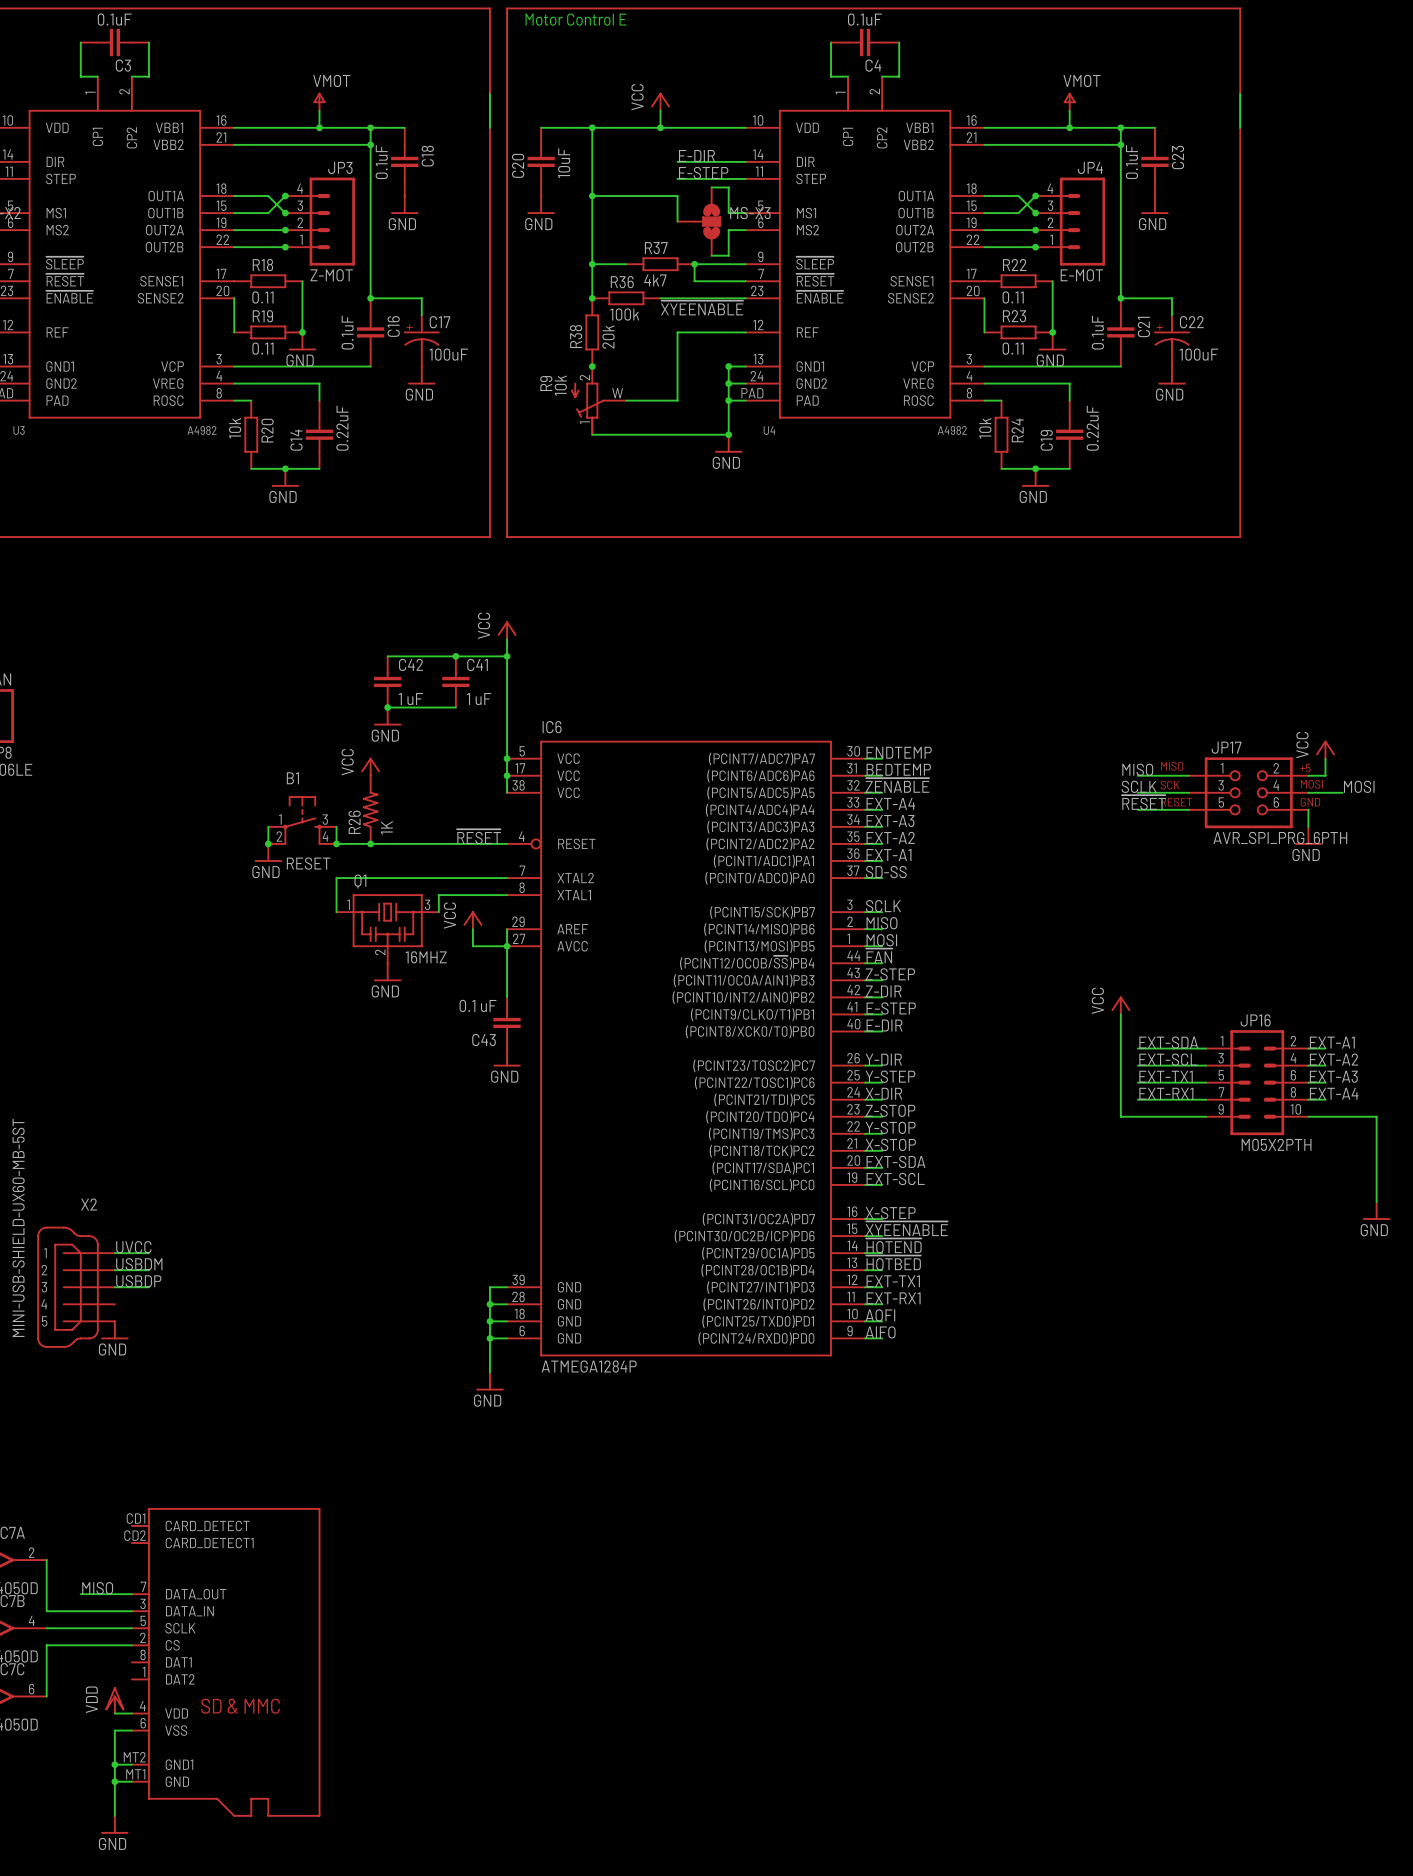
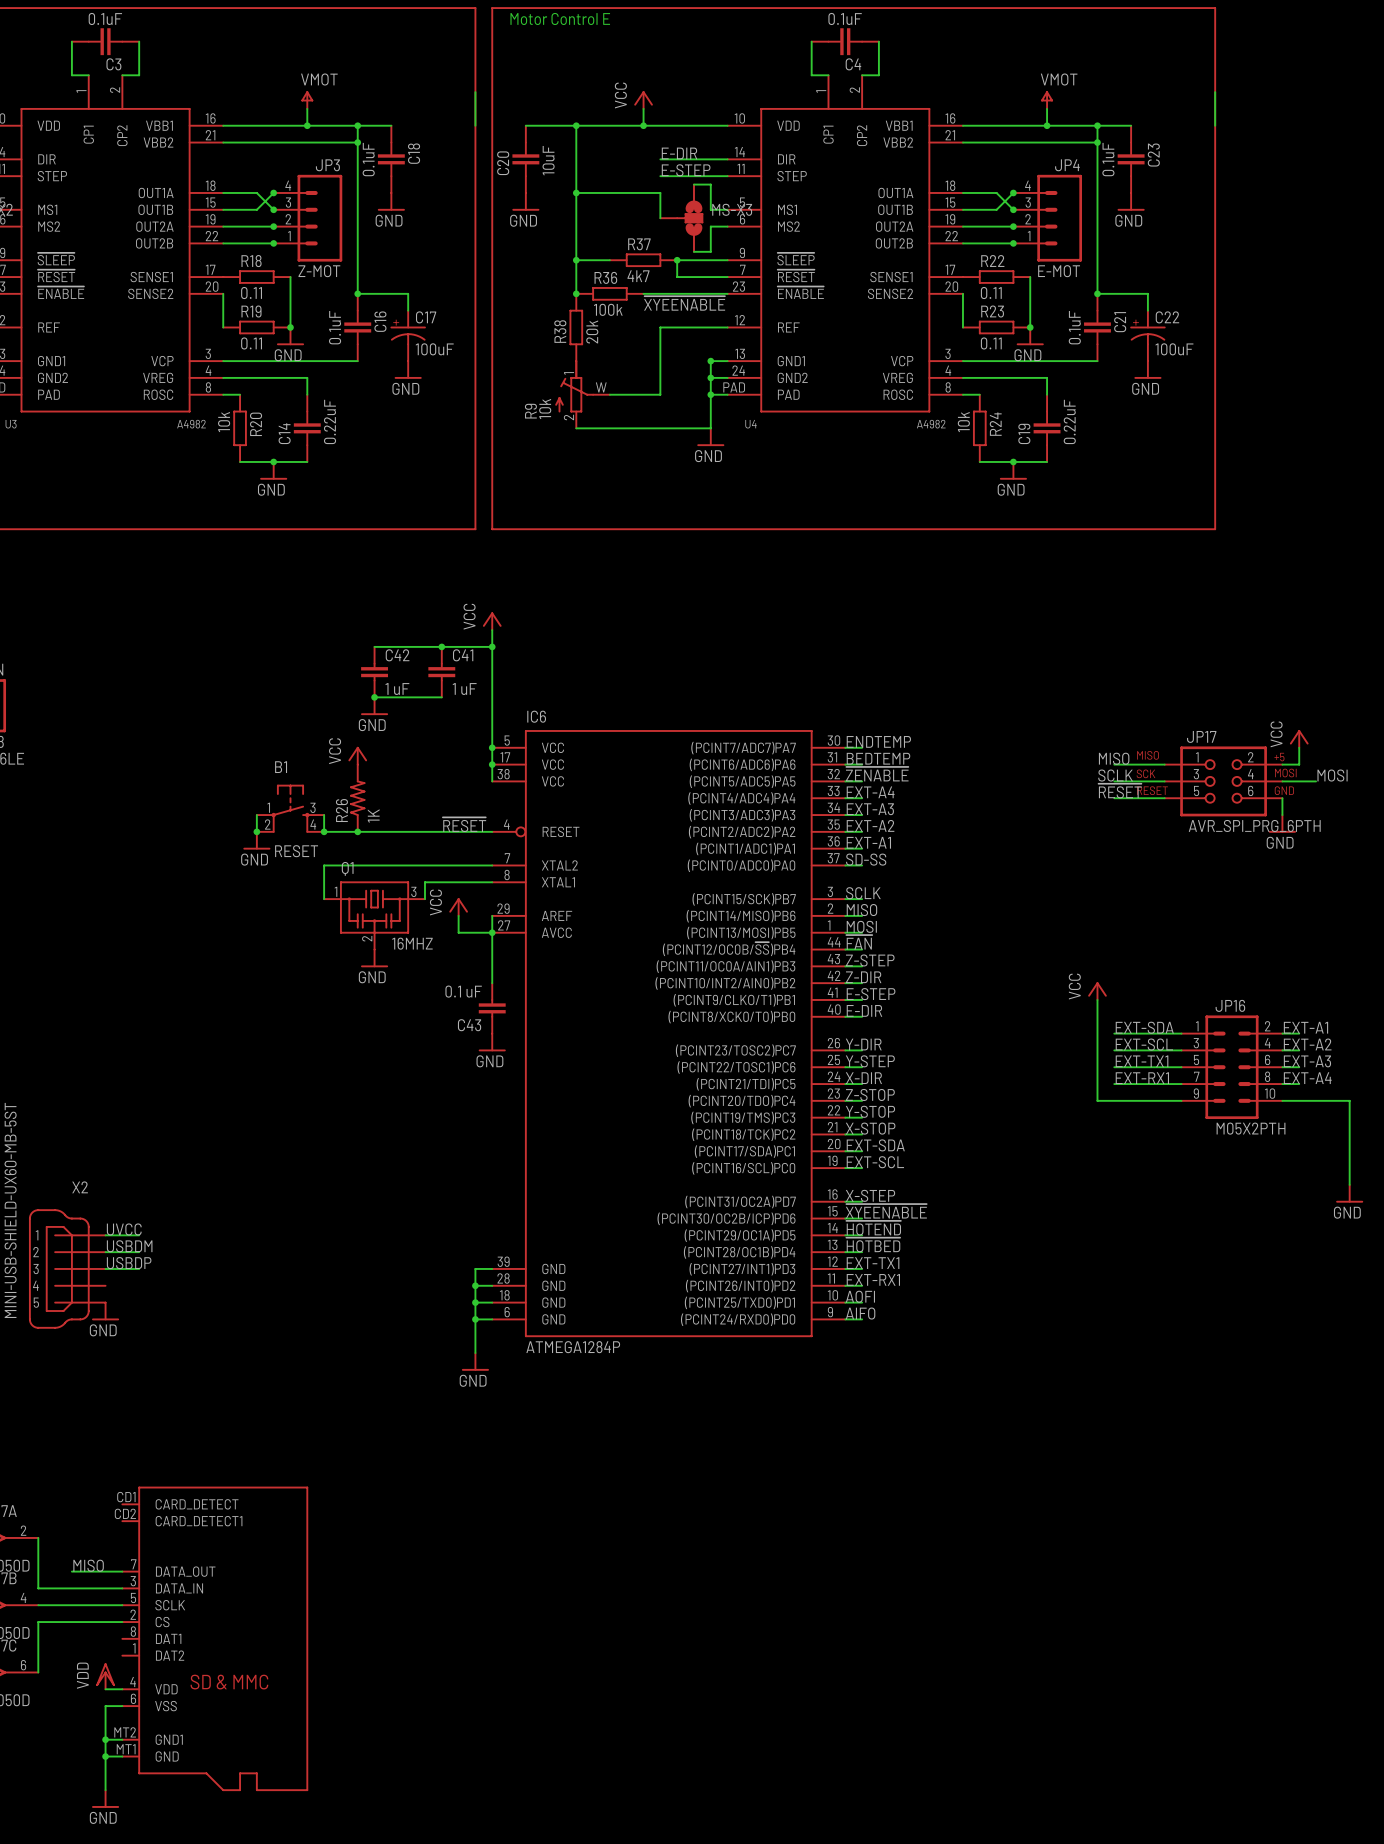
junction: (592, 366) -> none
R9 flip: as is (590, 408) -> up-down (574, 386)
junction: (728, 434) -> none

